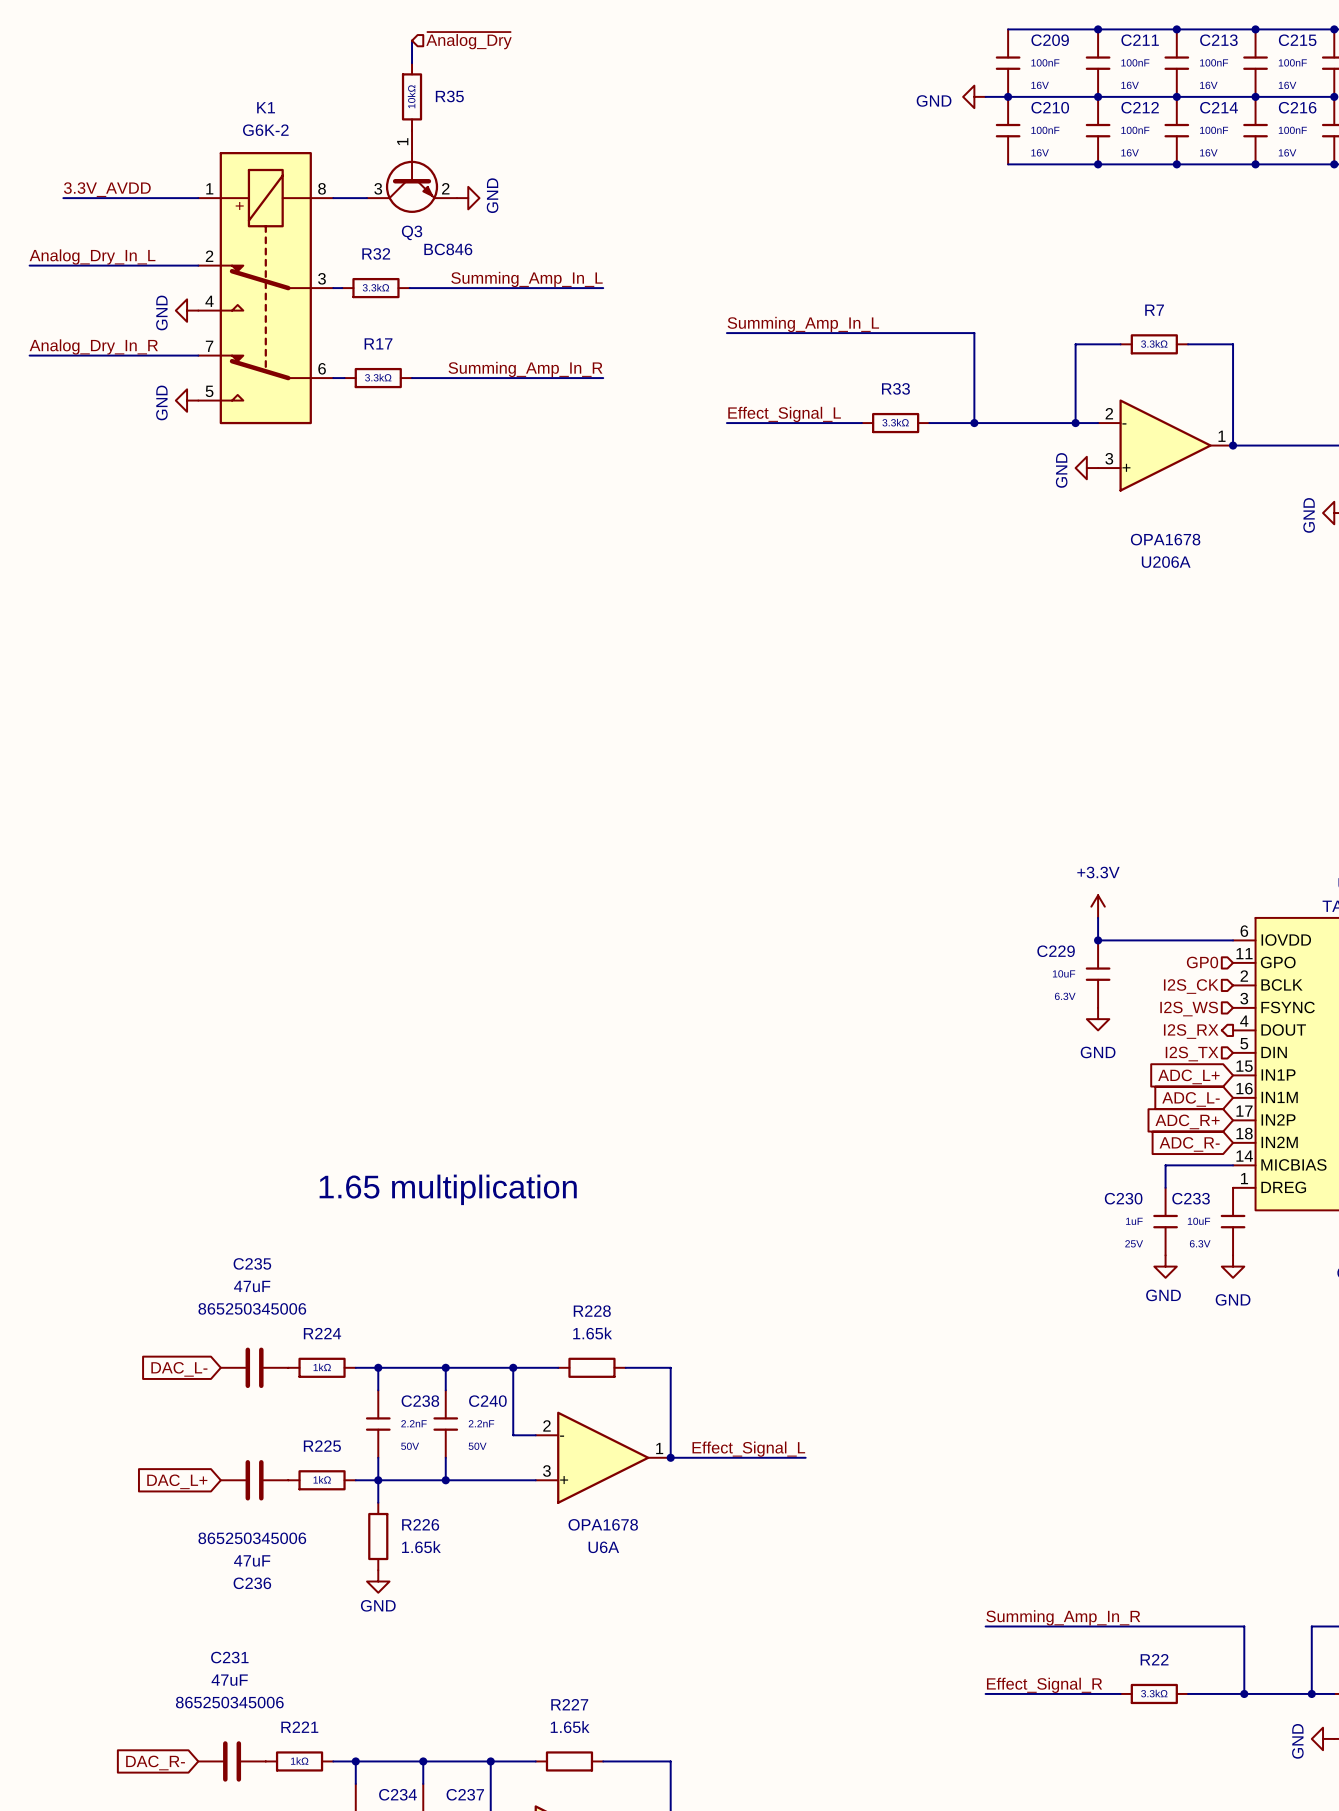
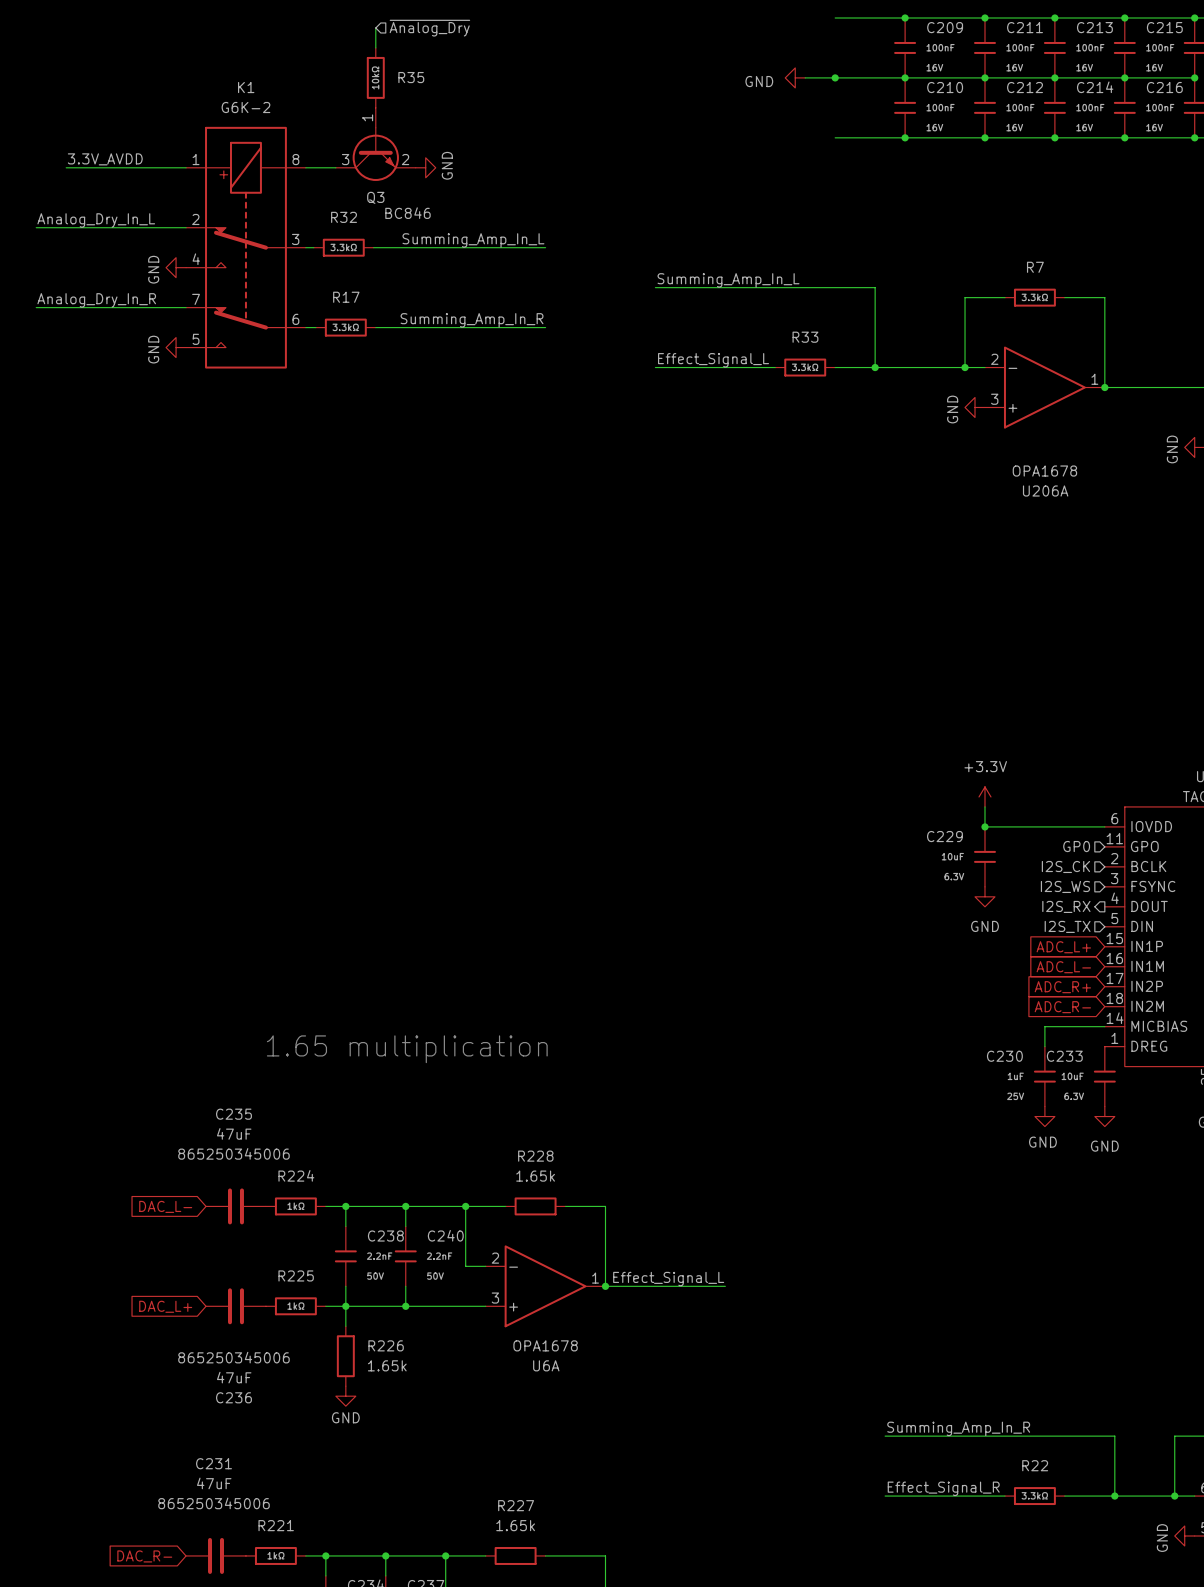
wire: none -> (835, 18) (905, 18)
junction: none -> (905, 18)
wire: none -> (805, 77) (885, 77)
junction: none -> (835, 77)
power symbol position: GND (974, 96) -> GND (795, 77)
wire: none -> (835, 137) (905, 137)
junction: none -> (905, 137)

